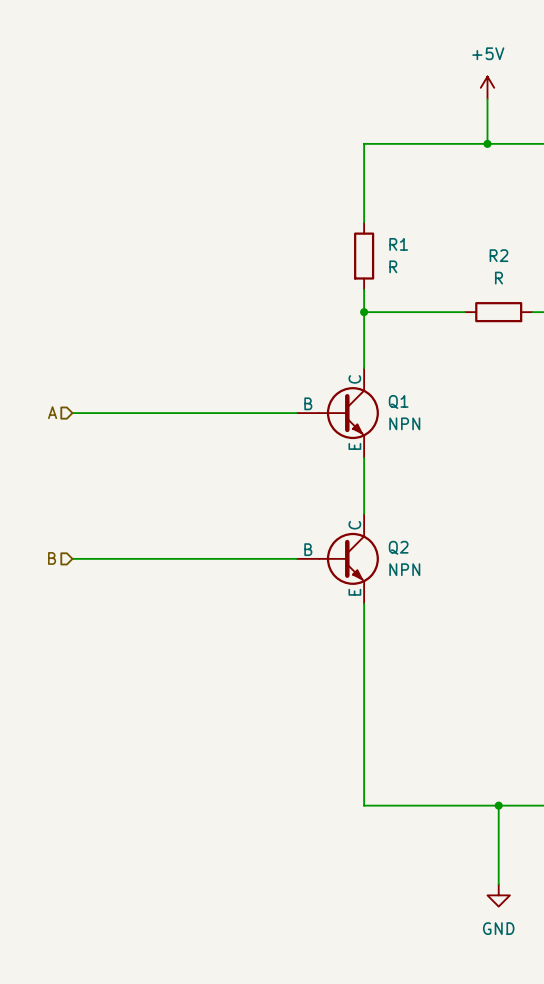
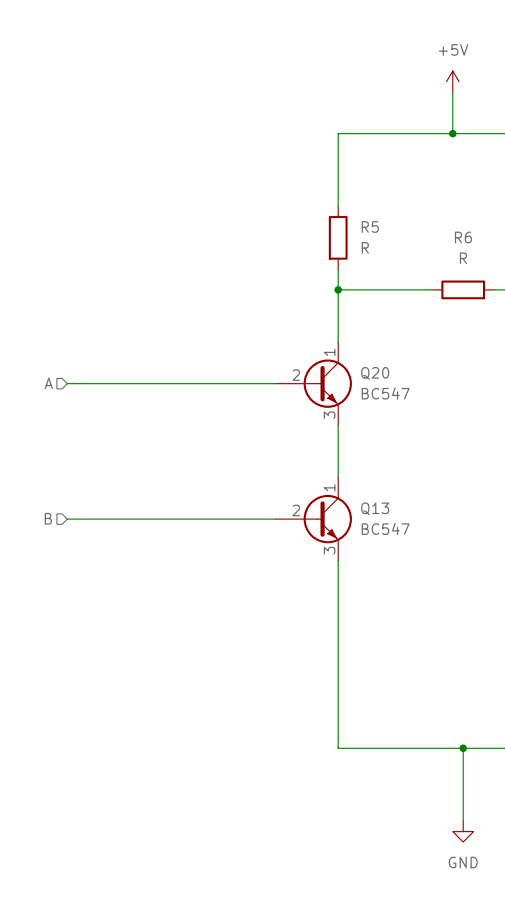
R1 name: R1 (398, 244) -> R5 (370, 227)
R2 name: R2 (498, 255) -> R6 (463, 237)
Q1: NPN (337, 413) -> none
Q20: none -> BC547 (313, 383)
Q2: NPN (337, 558) -> none
Q13: none -> BC547 (313, 519)

